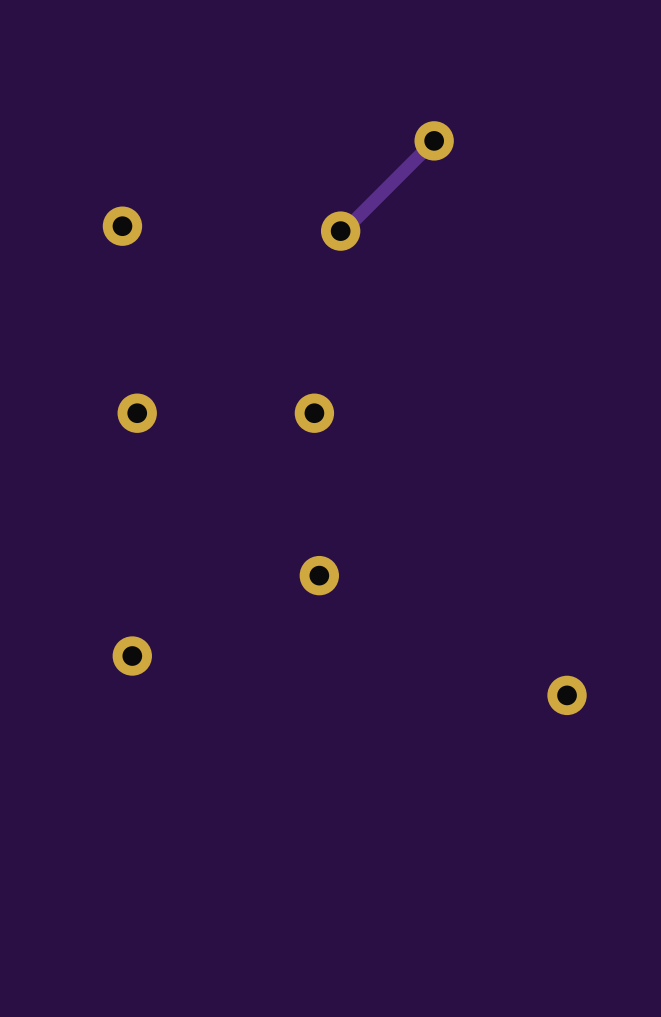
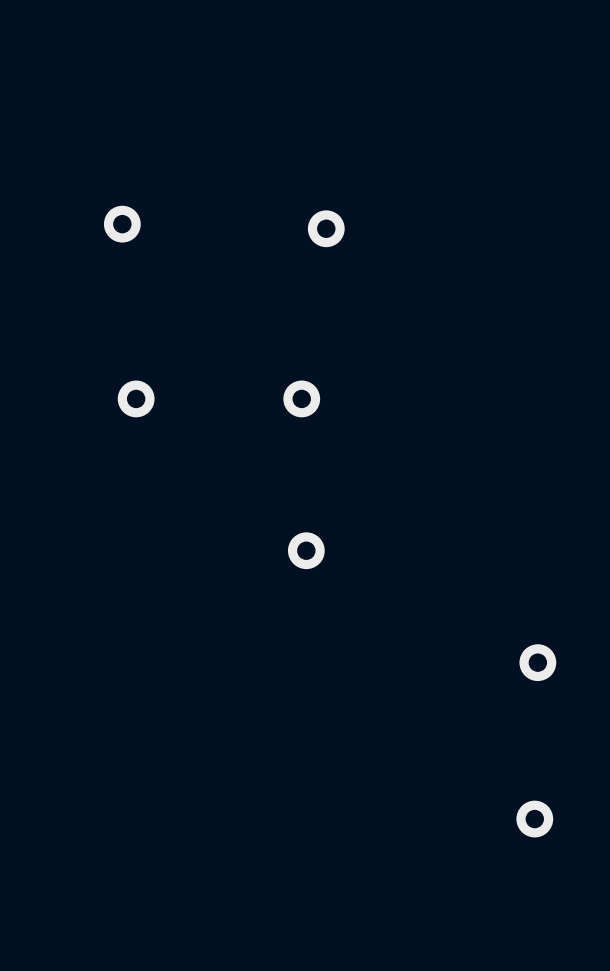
track: (434, 140) (343, 231) (340, 231) -> none
via: (434, 140) -> none
via: (132, 656) -> none
via: none -> (534, 819)

